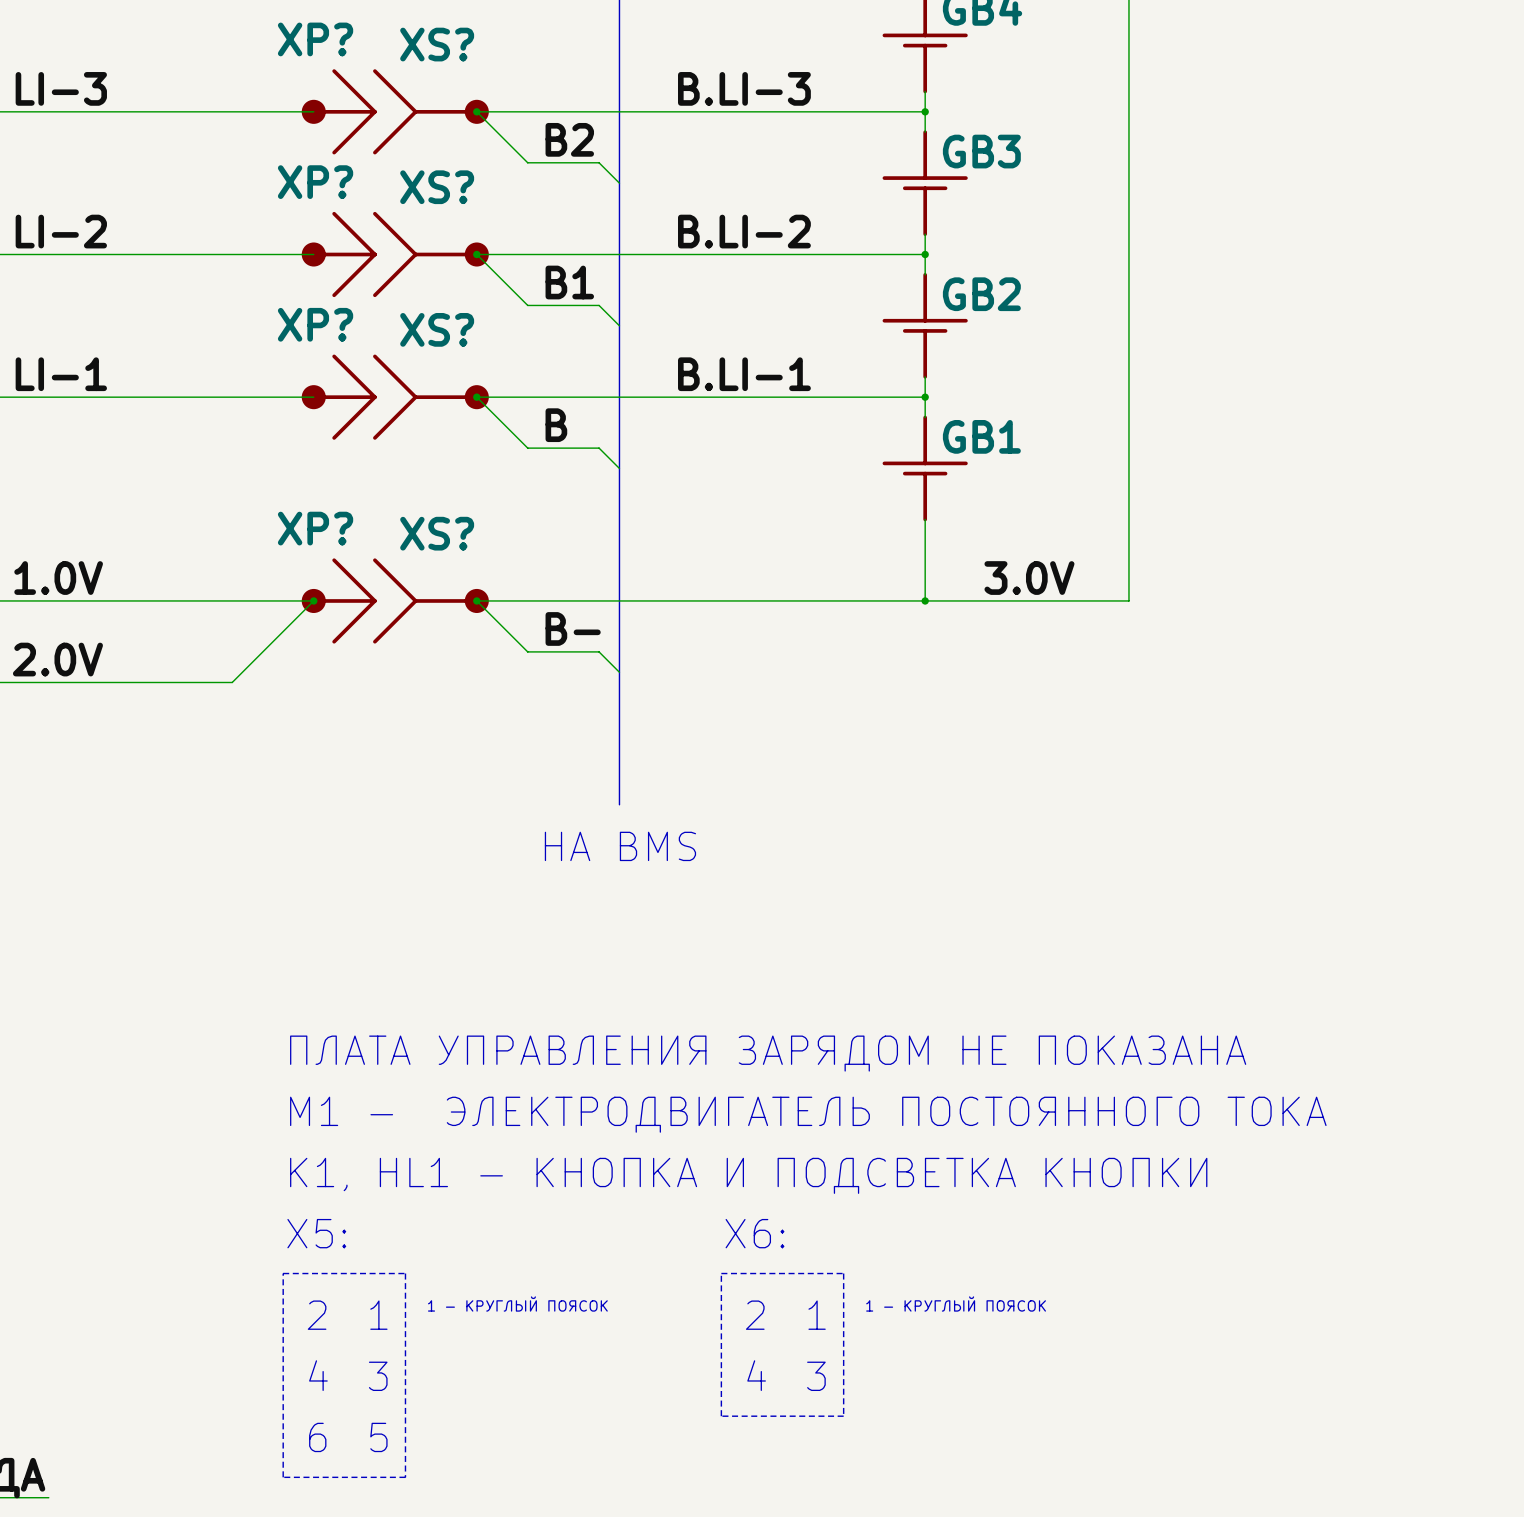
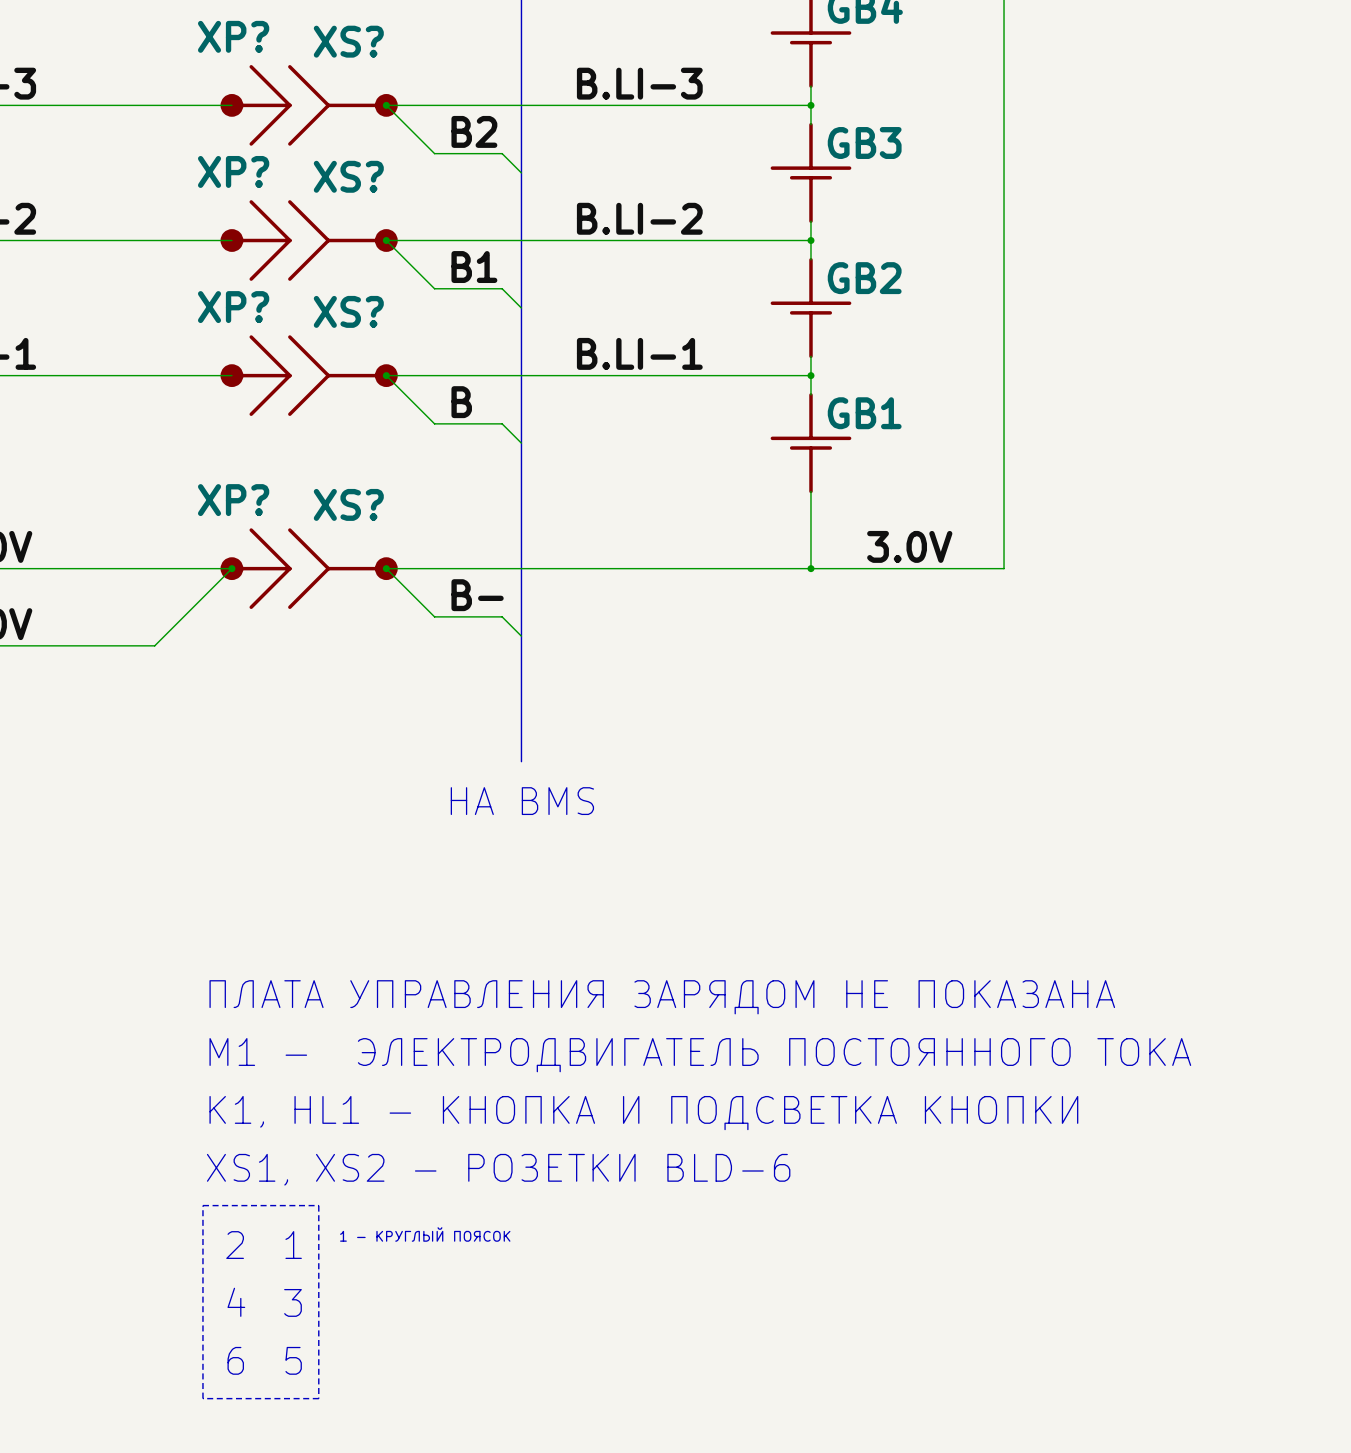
text: X5: (316, 1233) -> XS1, XS2 - РОЗЕТКИ BLD-6 (498, 1169)
text: X6: (754, 1233) -> none
line: (721, 1273) (843, 1273) (843, 1416) (721, 1416) (721, 1273) -> none
text: 1 - КРУГЛЫЙ ПОЯСОК (956, 1304) -> none
text: 2 (755, 1315) -> none
text: 1 (817, 1315) -> none
text: 4 (756, 1375) -> none
text: 3 (816, 1376) -> none

